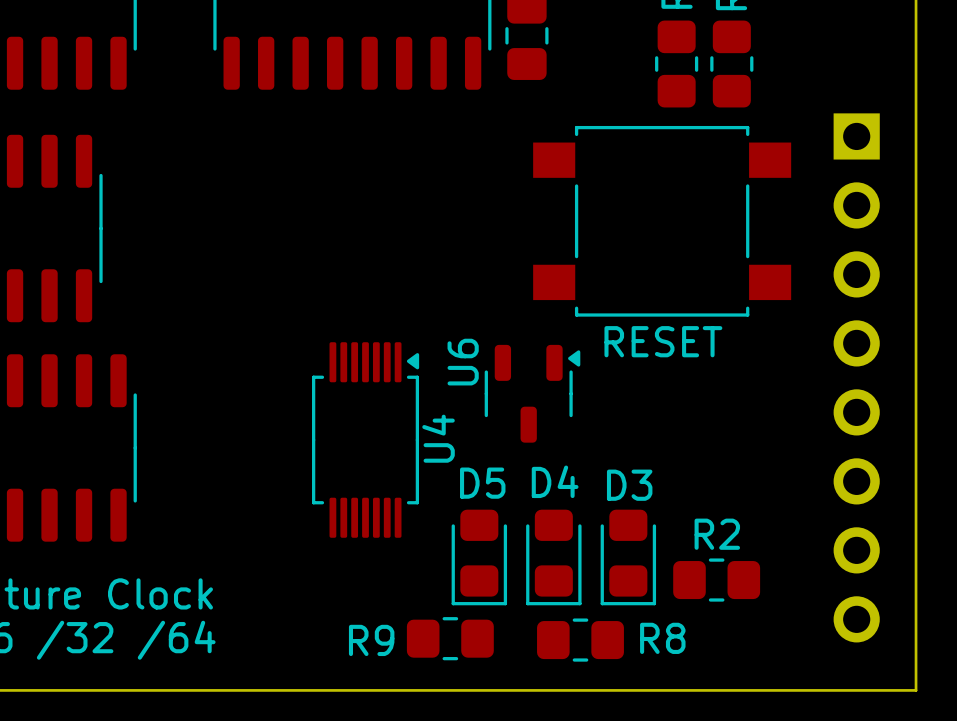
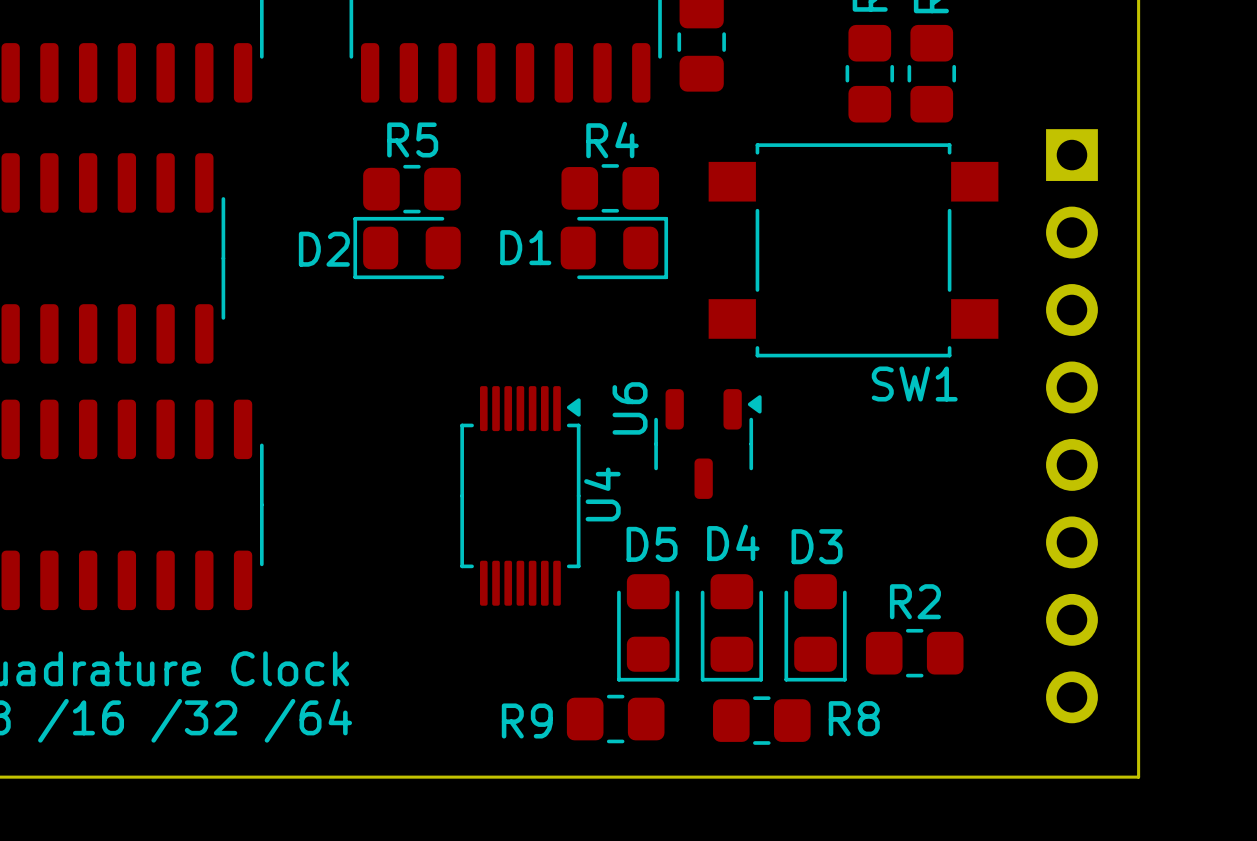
R5: none -> (411, 189)
R4: none -> (610, 188)
D2: none -> (407, 248)
D1: none -> (614, 248)
SW1 name: none -> SW1 (914, 384)
SW1 value: RESET (663, 341) -> none

